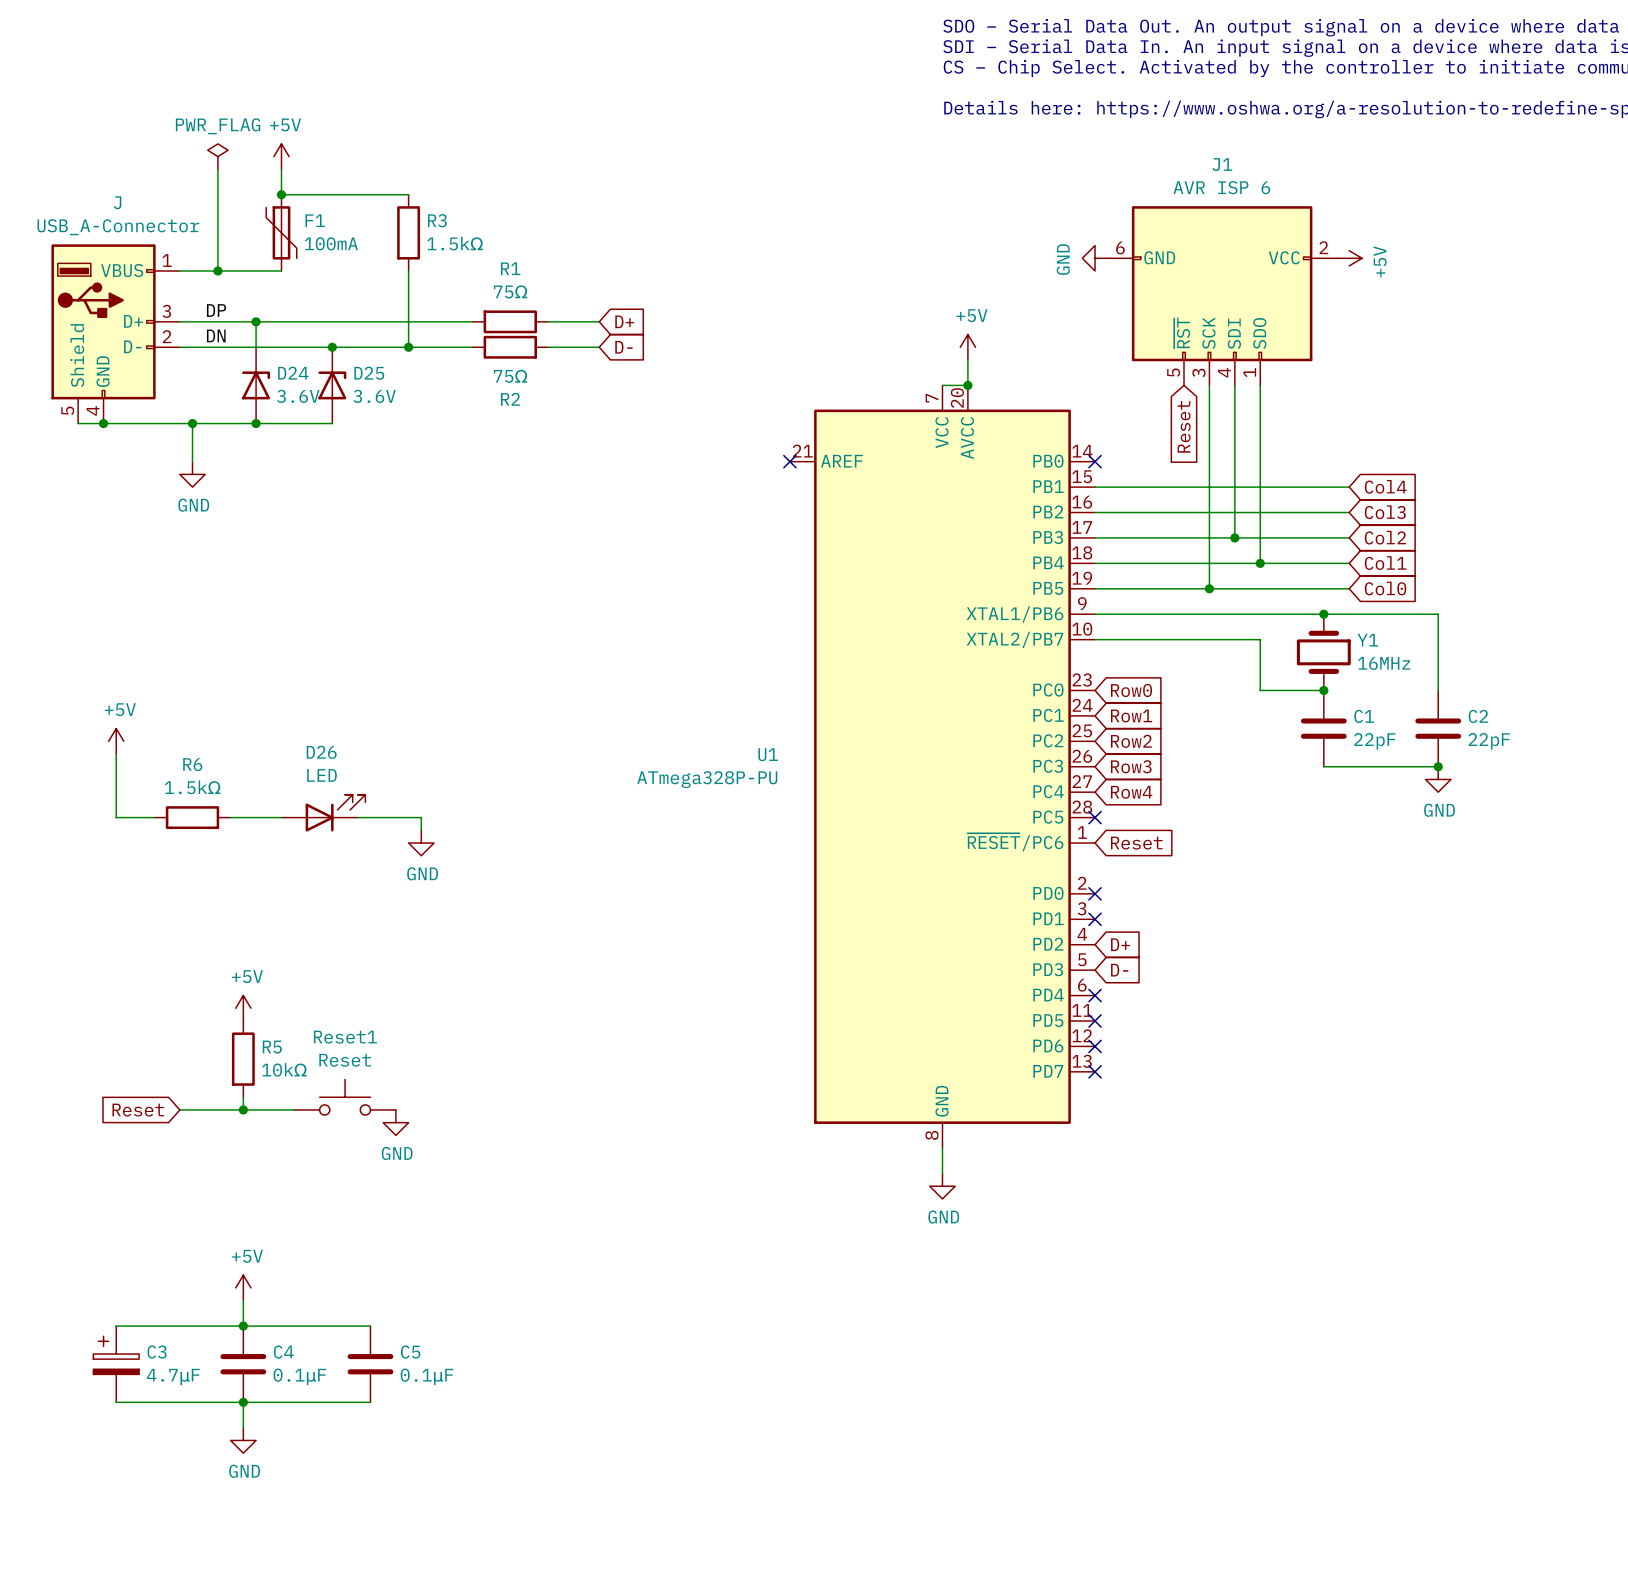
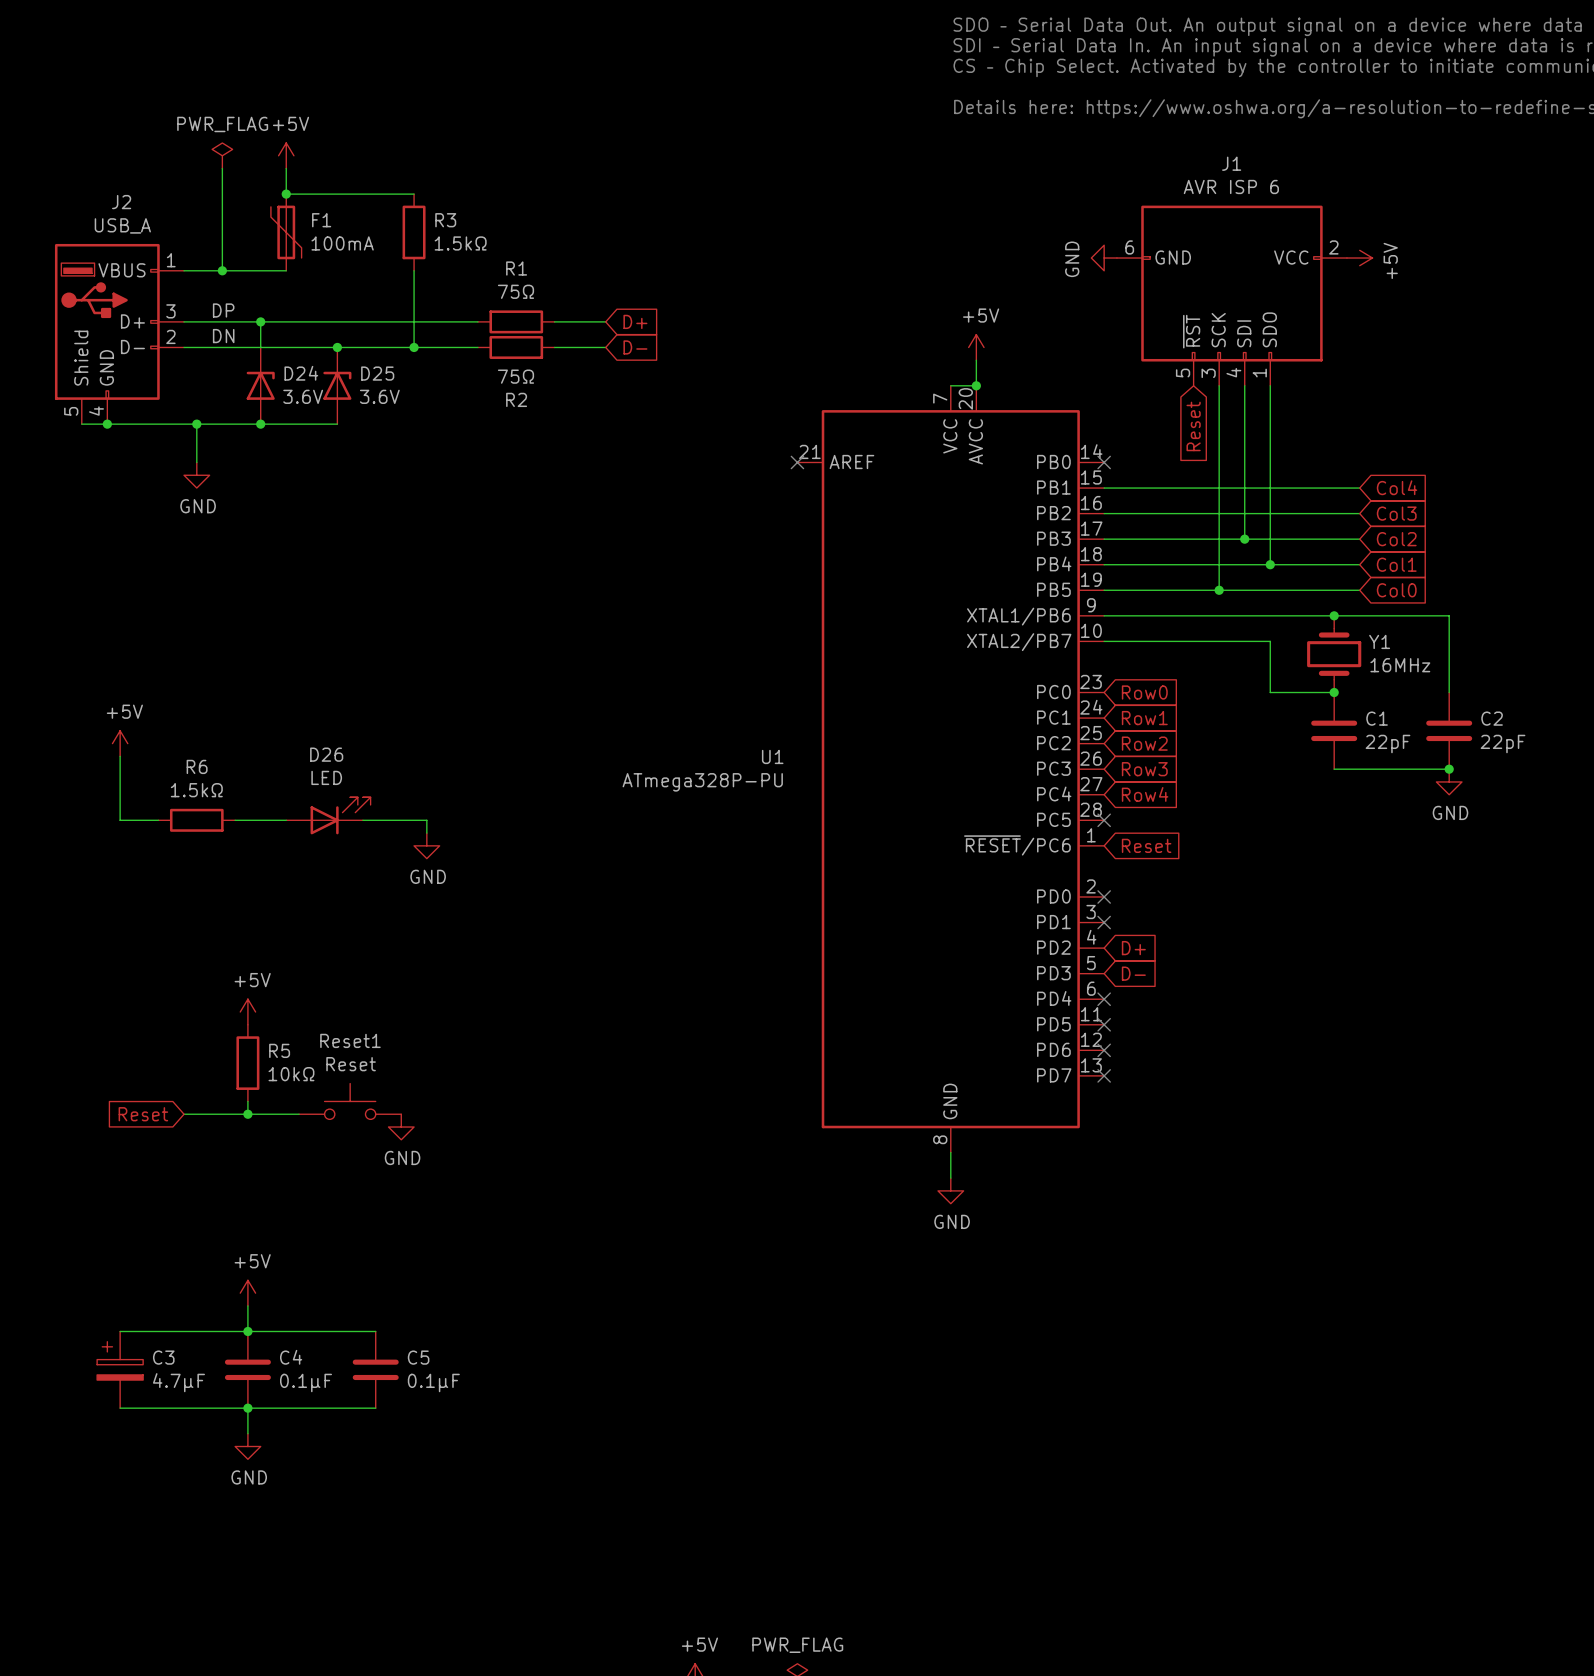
J name: J (117, 202) -> J2 (121, 202)
J value: USB_A-Connector (118, 227) -> USB_A (122, 225)

